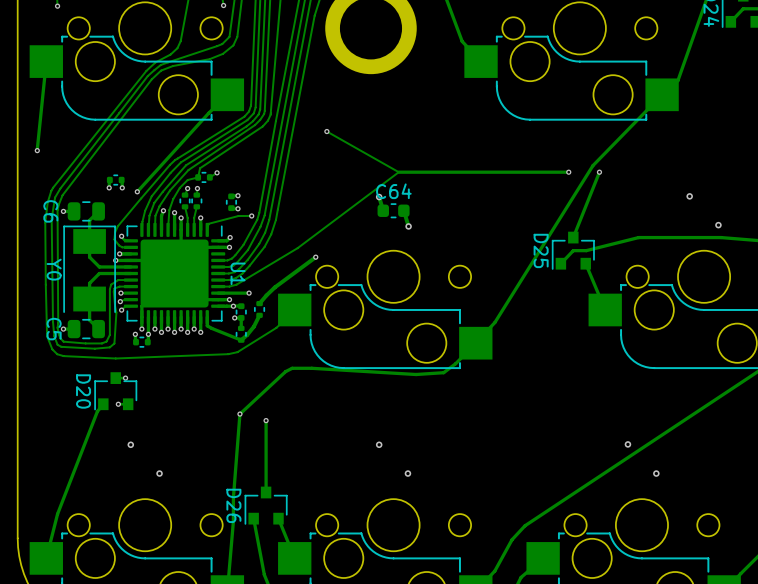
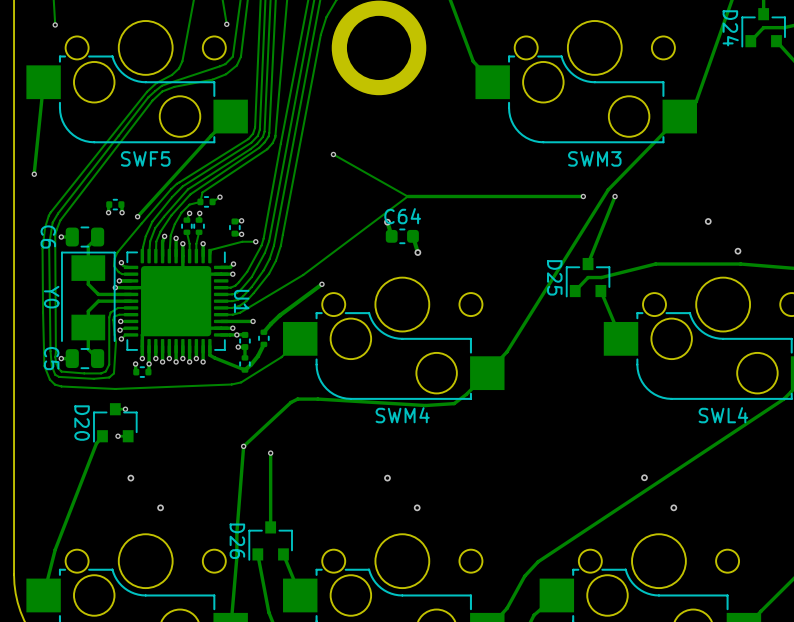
SWF5 name: none -> SWF5 (145, 158)
SWM3 name: none -> SWM3 (594, 158)
SWM4 name: none -> SWM4 (402, 415)
SWL4 name: none -> SWL4 (723, 415)

